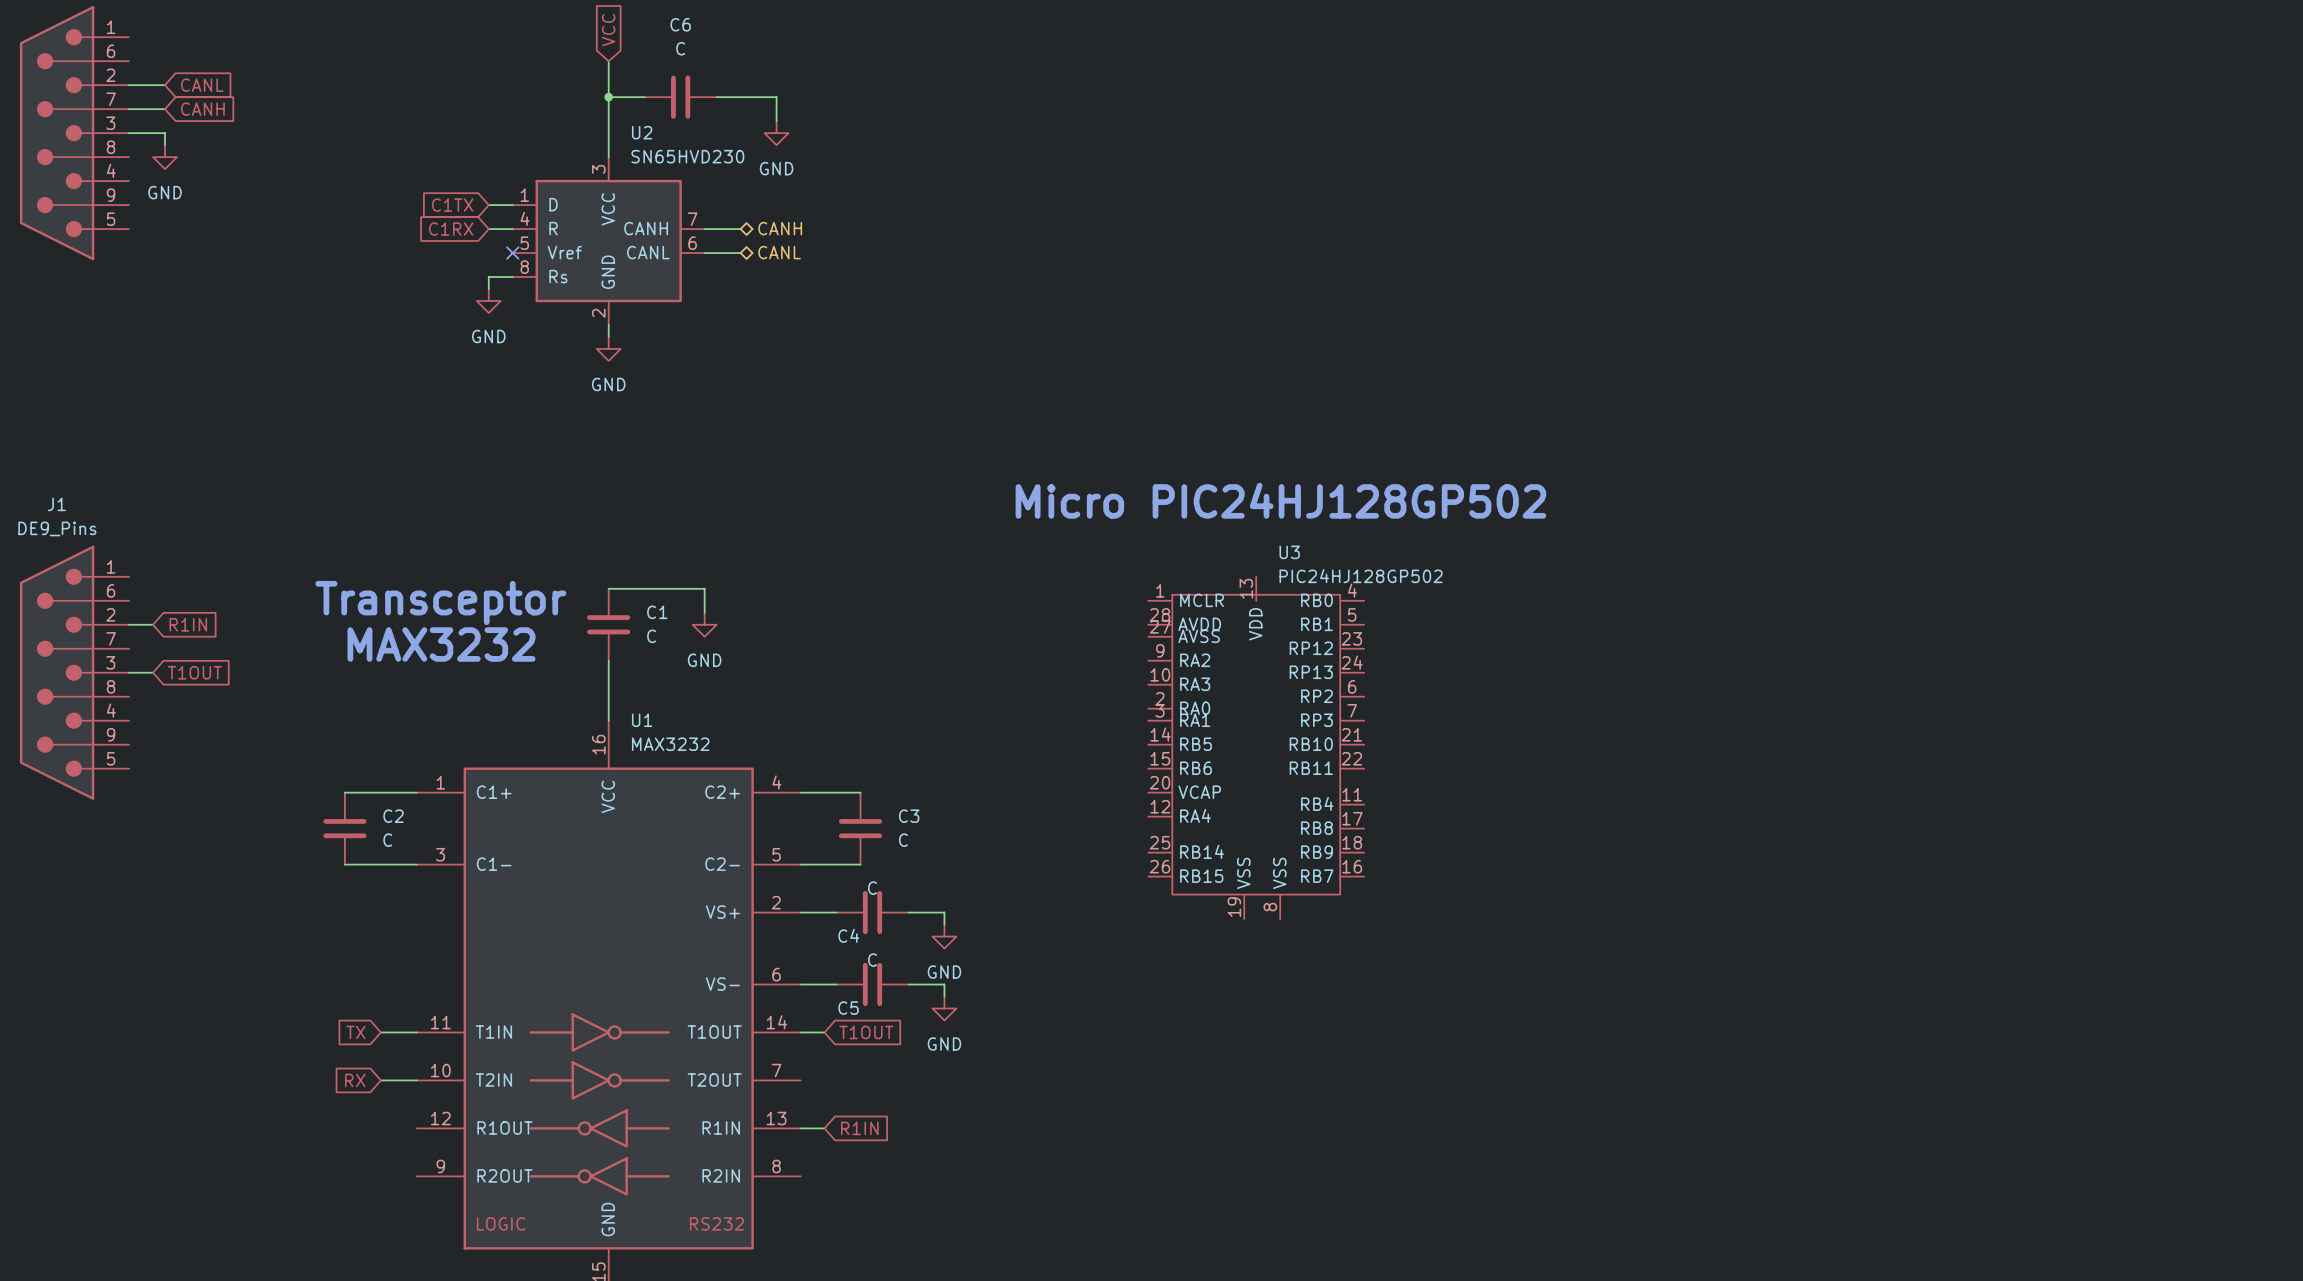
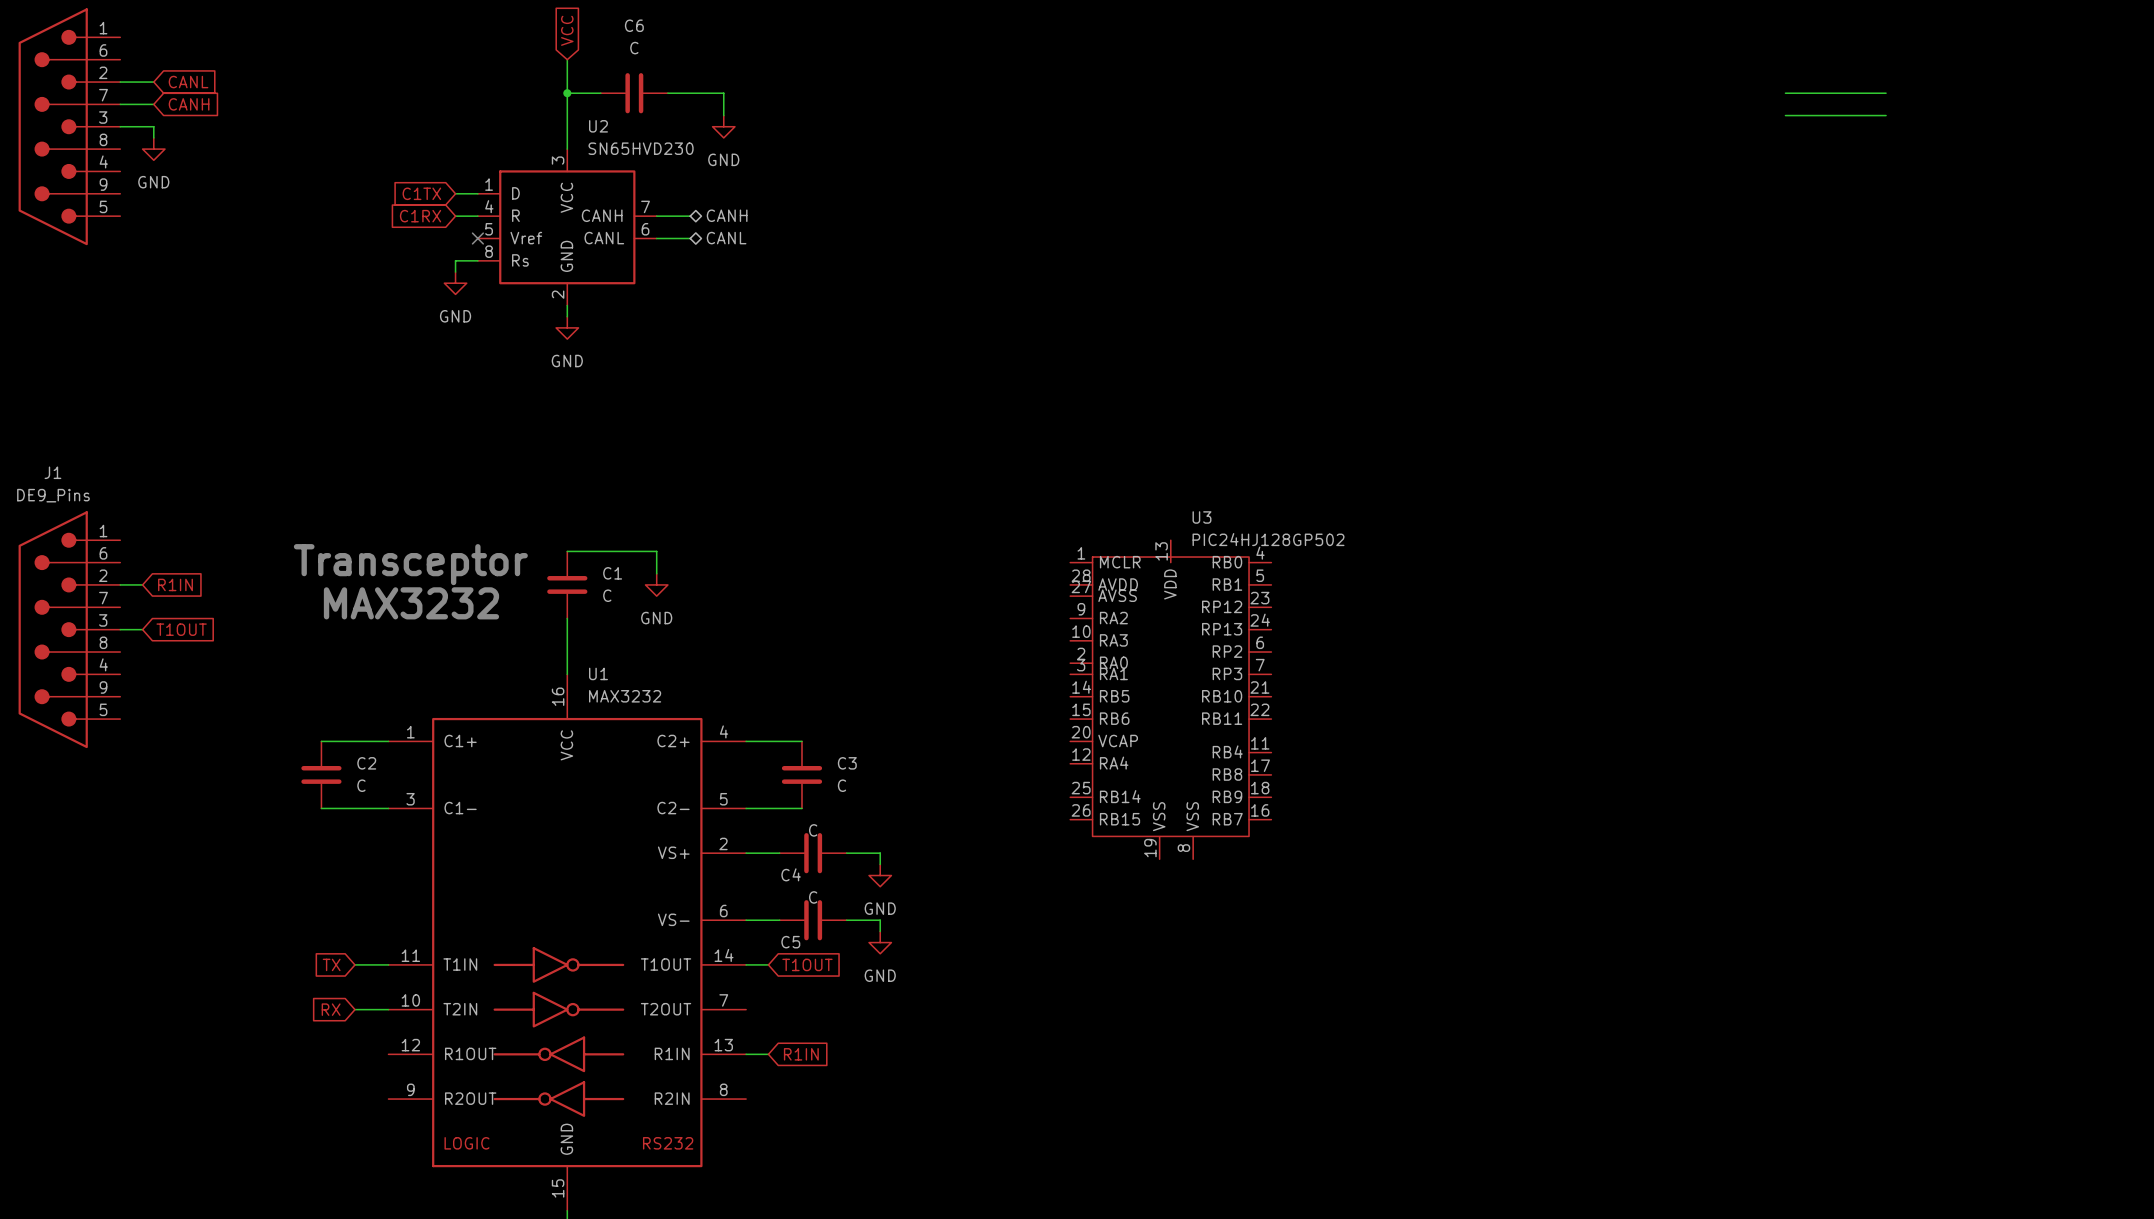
wire: none -> (1785, 93) (1886, 93)
wire: none -> (1785, 115) (1886, 115)
text: Micro PIC24HJ128GP502 (1280, 500) -> none

